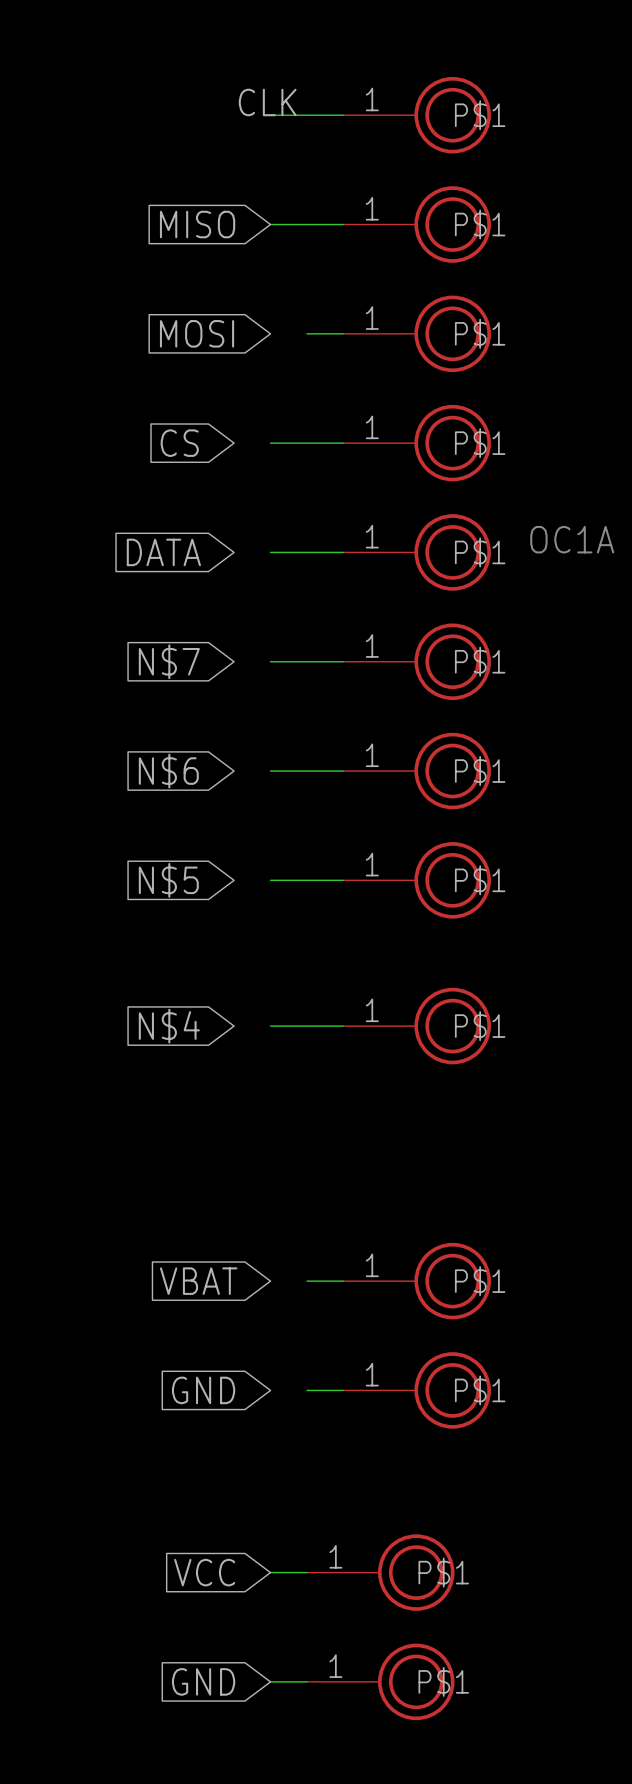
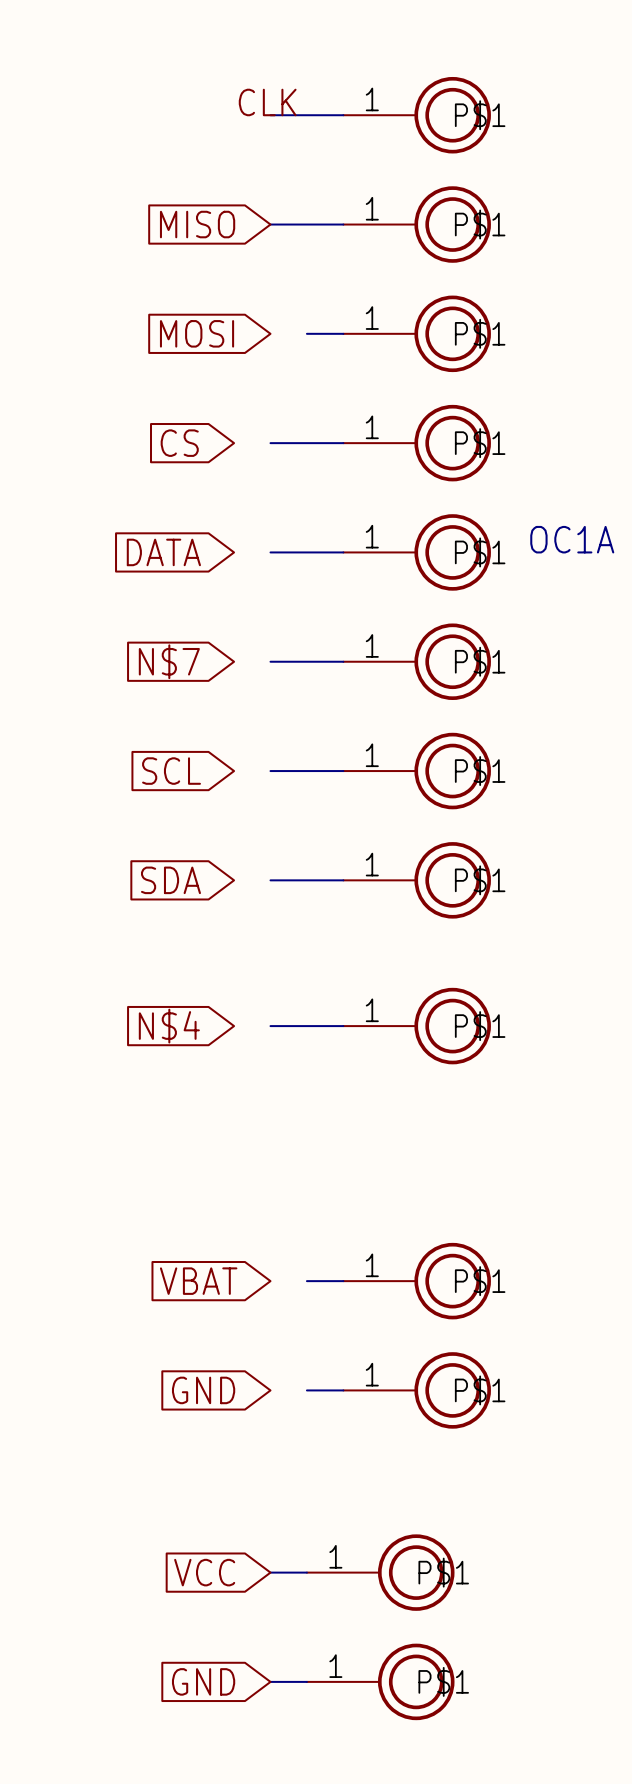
global label: N$6 (168, 771) -> SCL (171, 771)
global label: N$5 (168, 880) -> SDA (170, 880)

